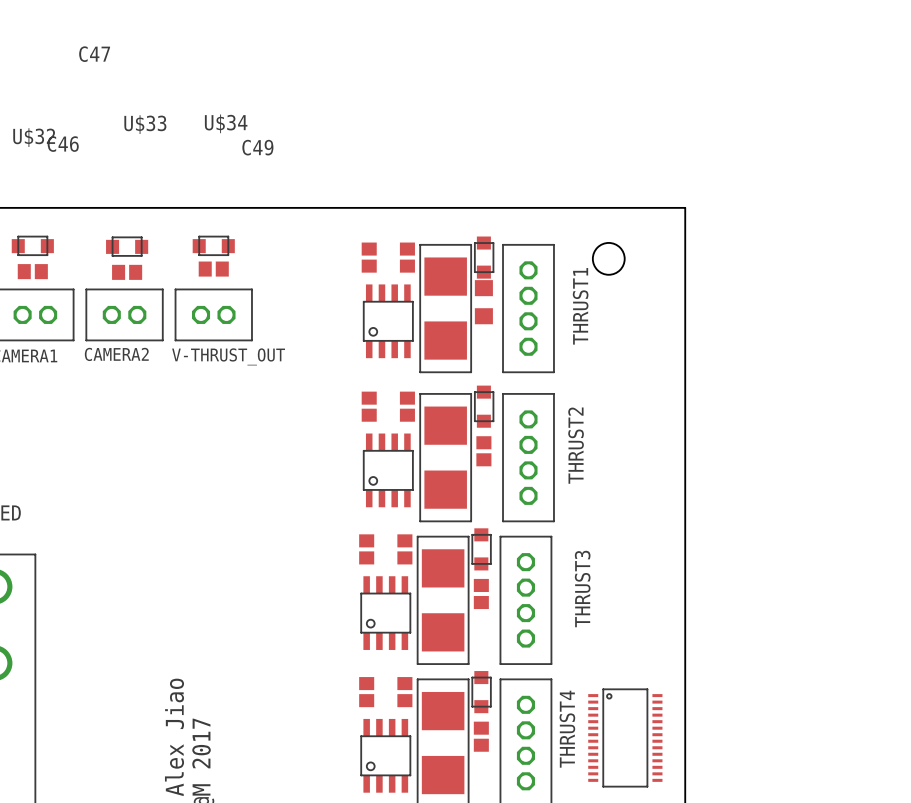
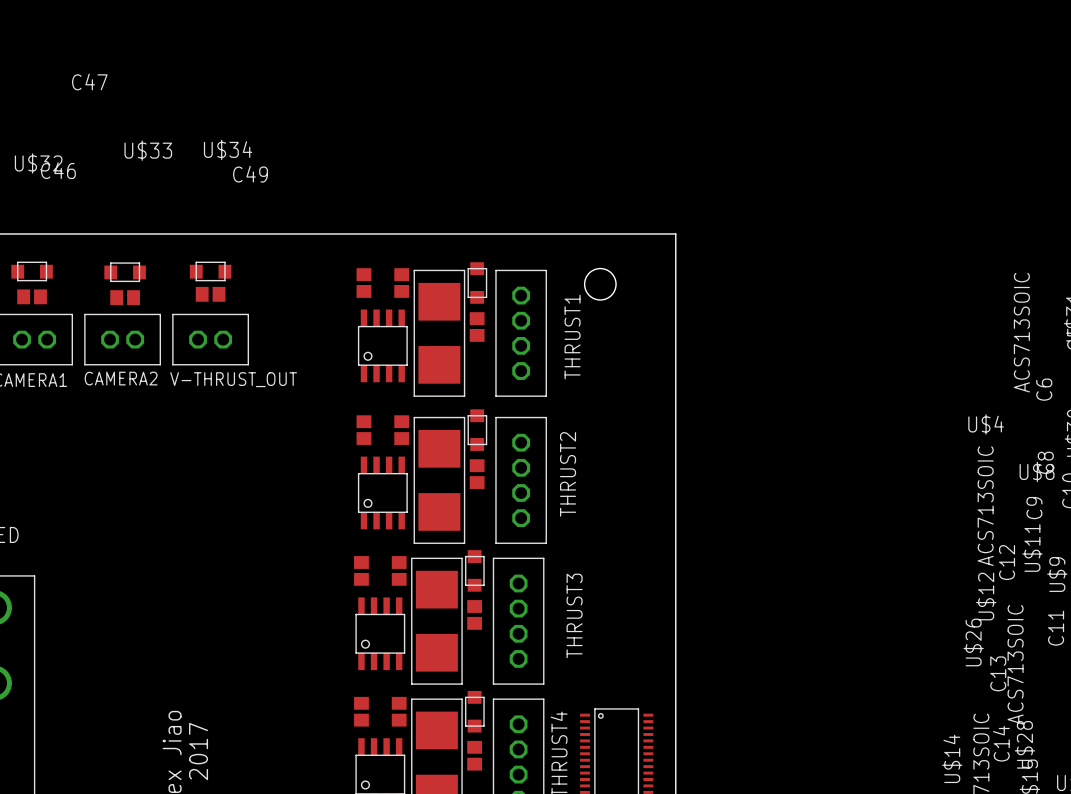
part footprint: [474, 280, 493, 325] -> [469, 312, 485, 342]

